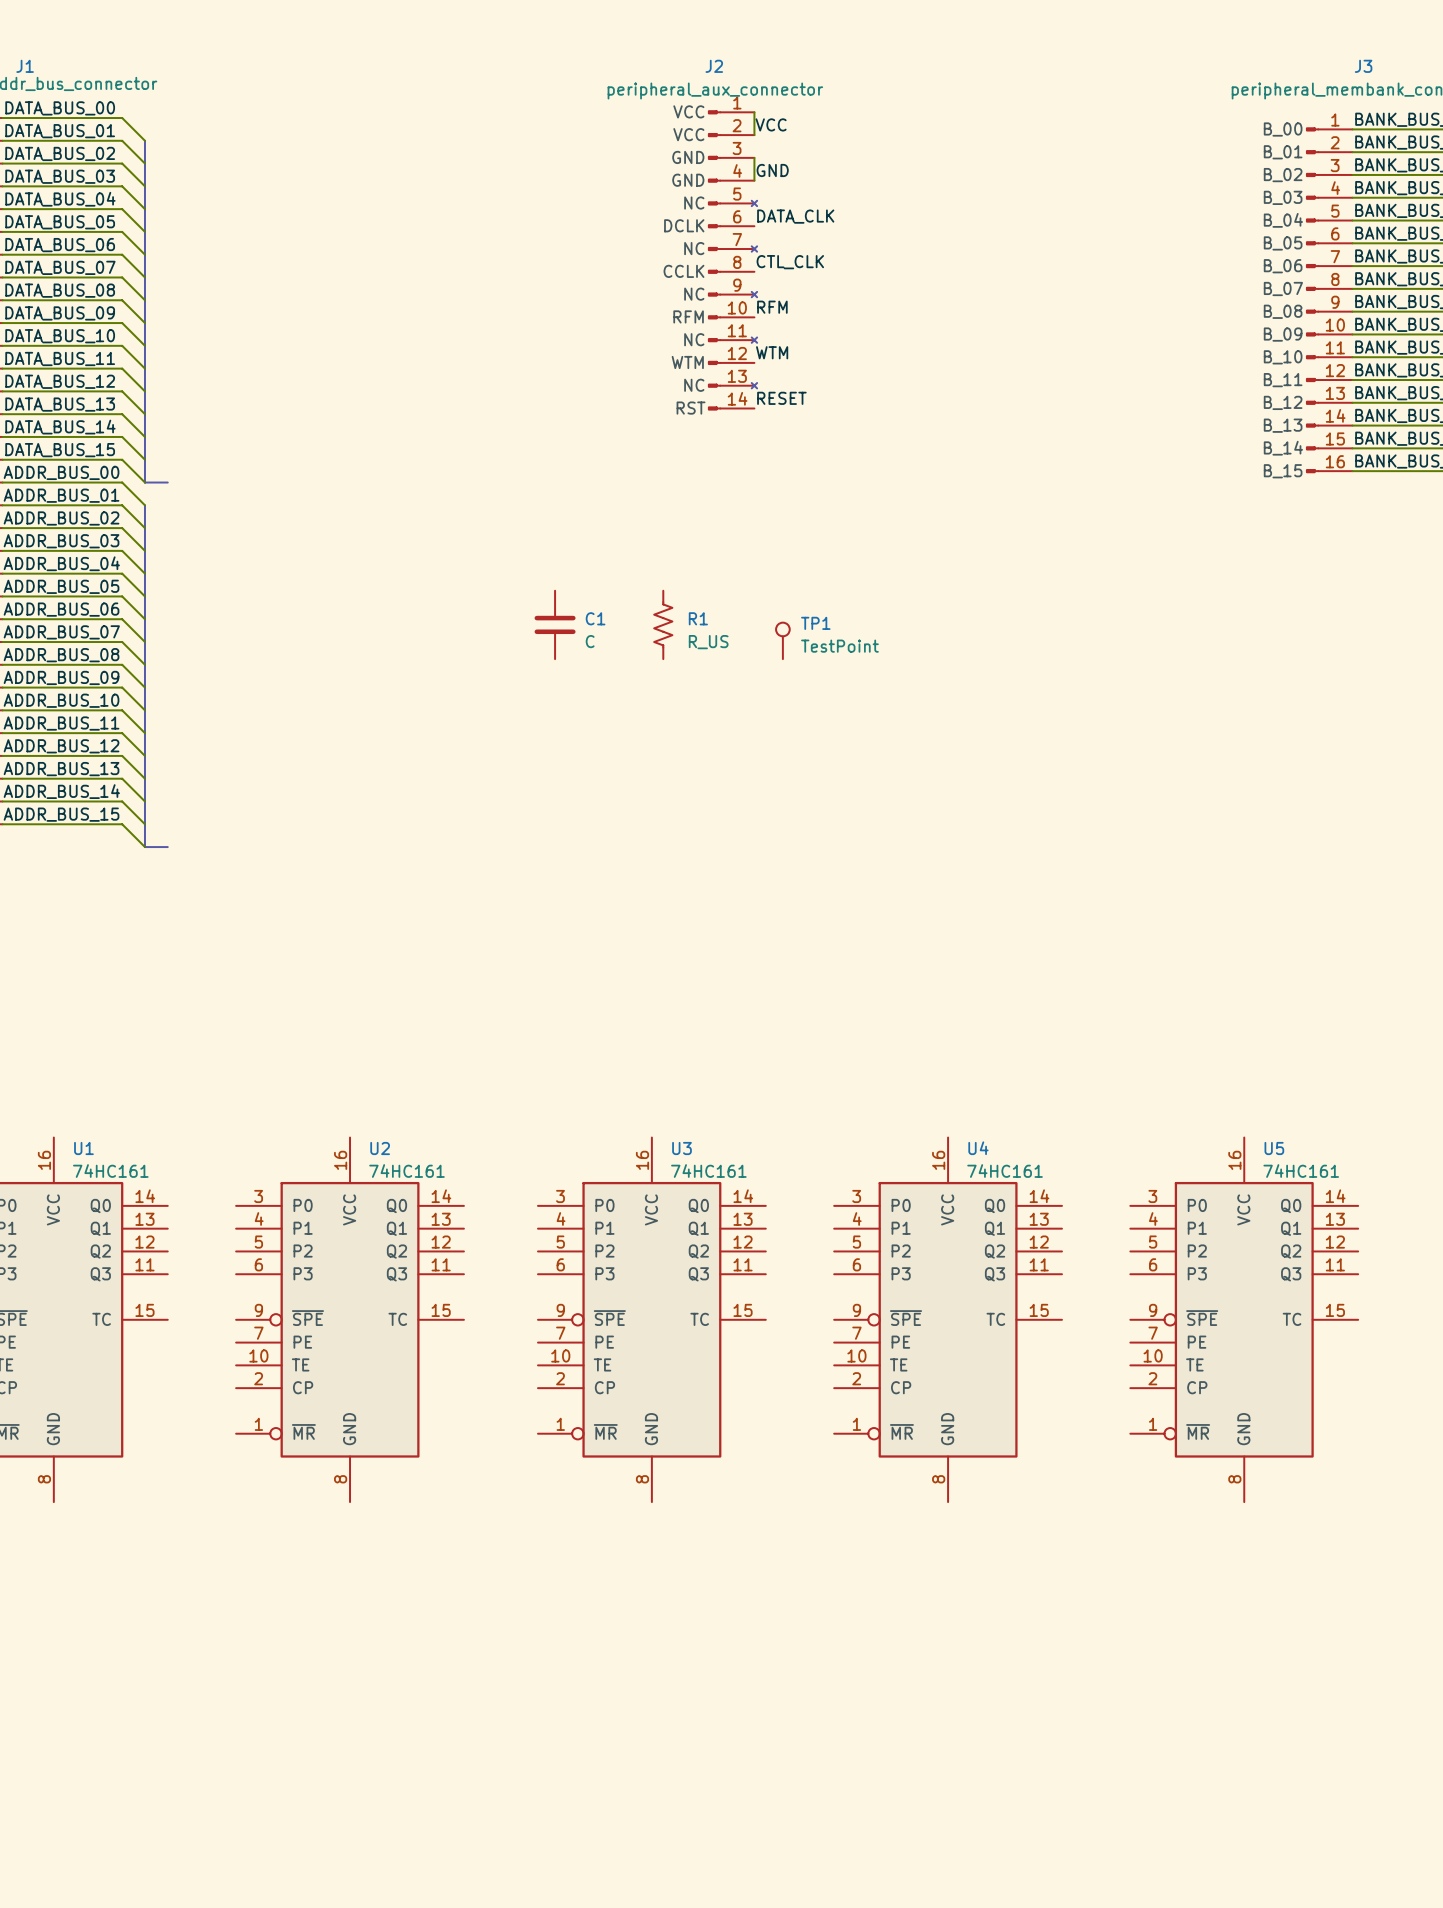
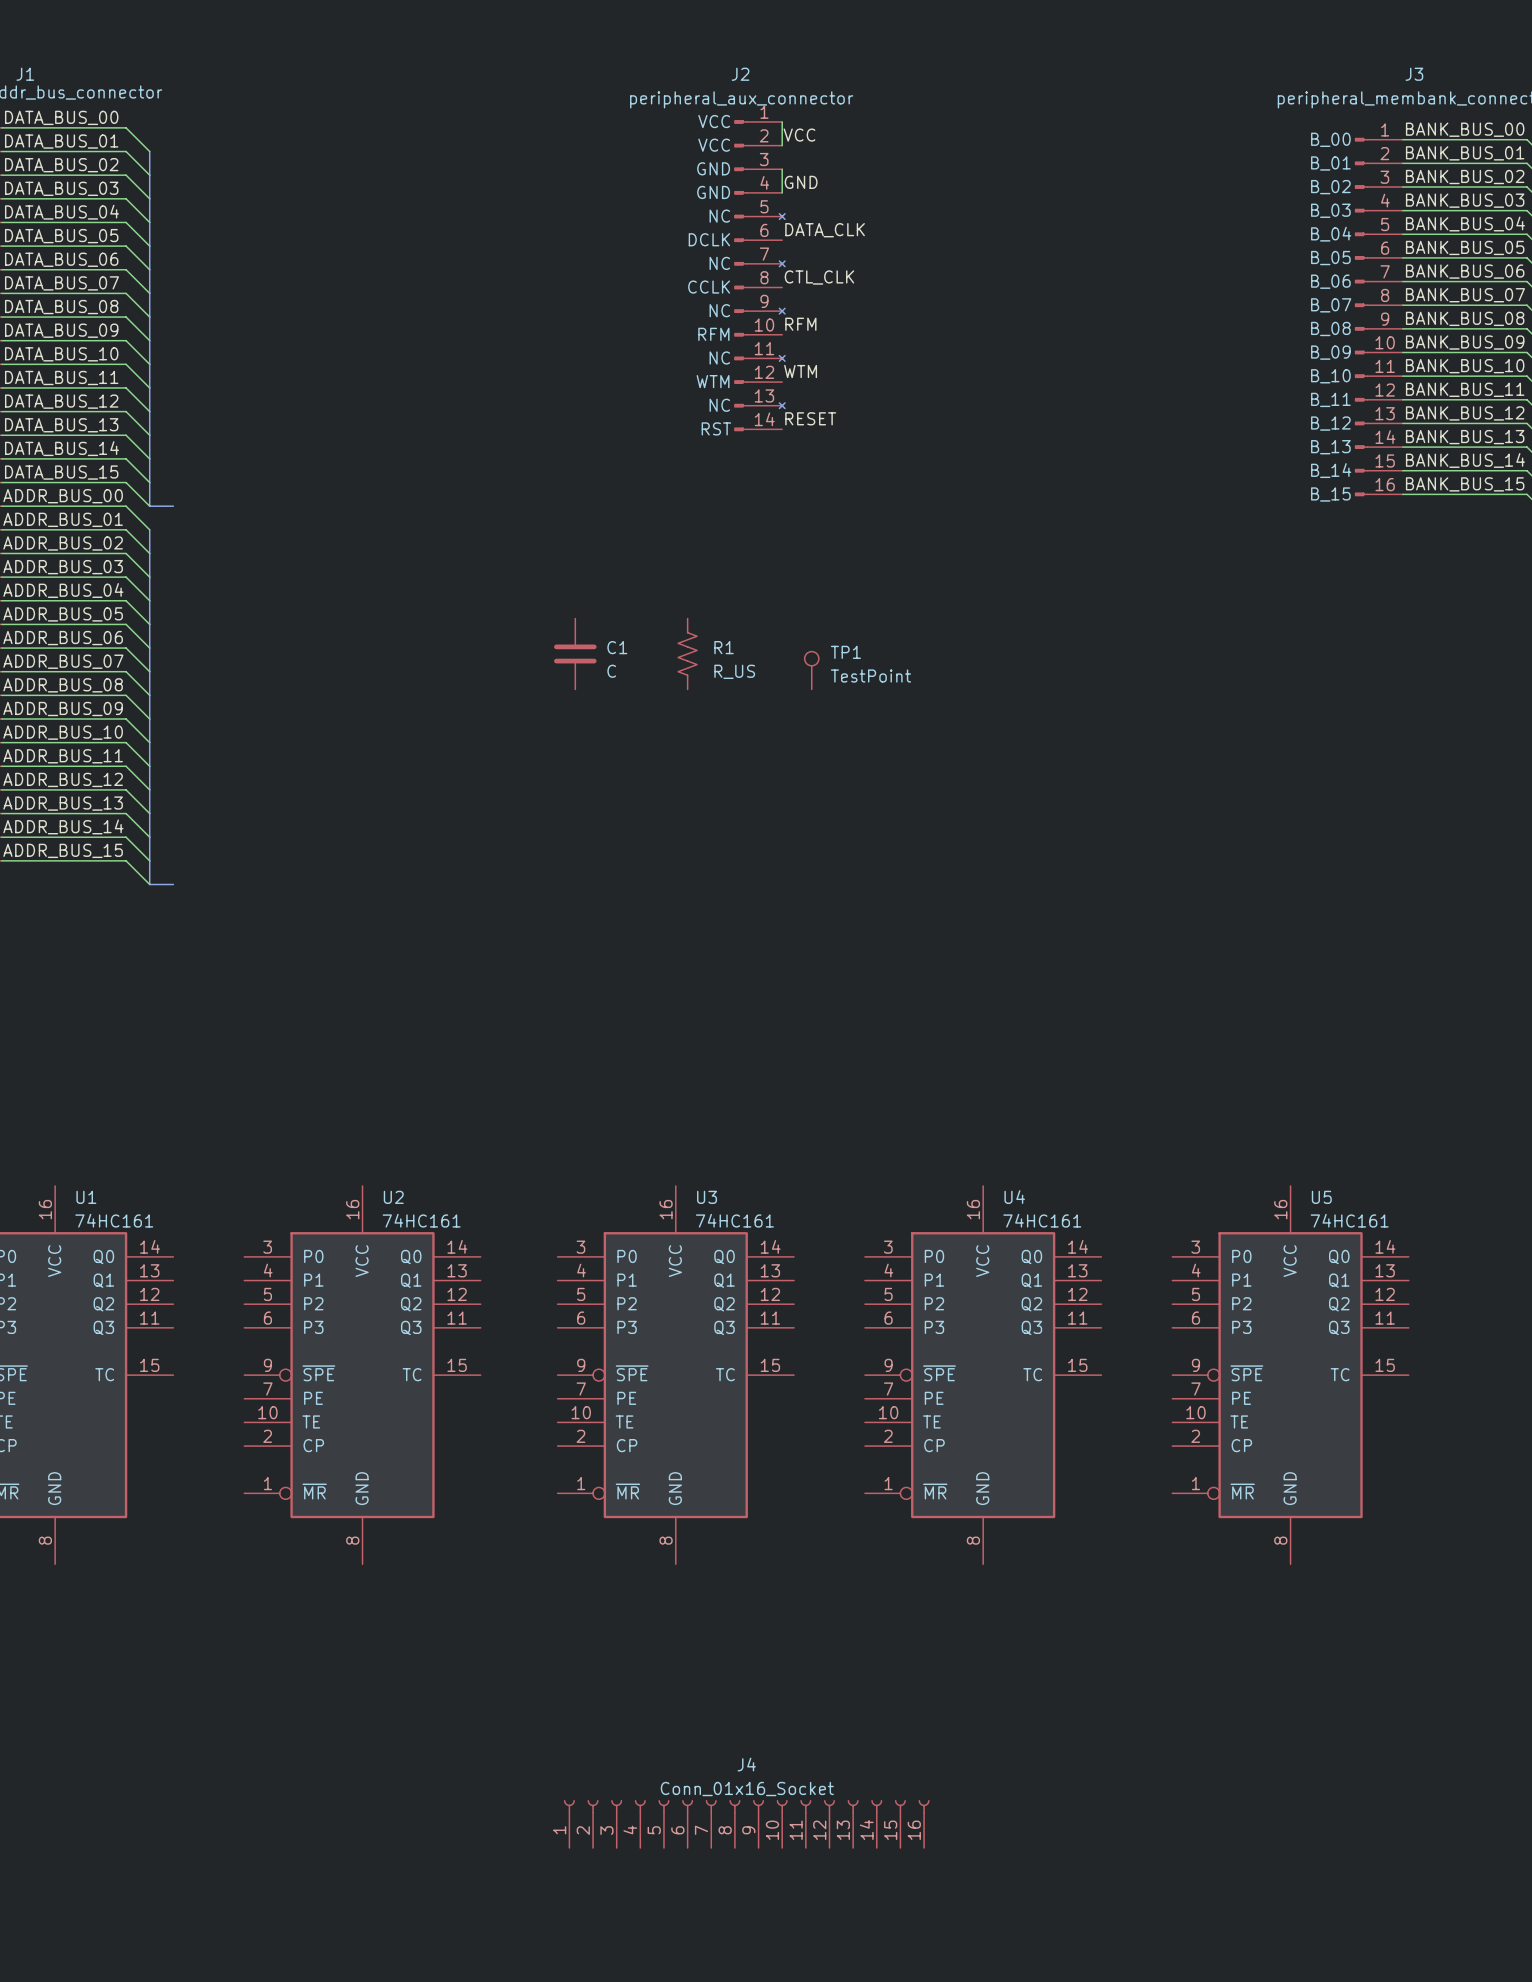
J4: none -> Conn_01x16_Socket (746, 1824)

